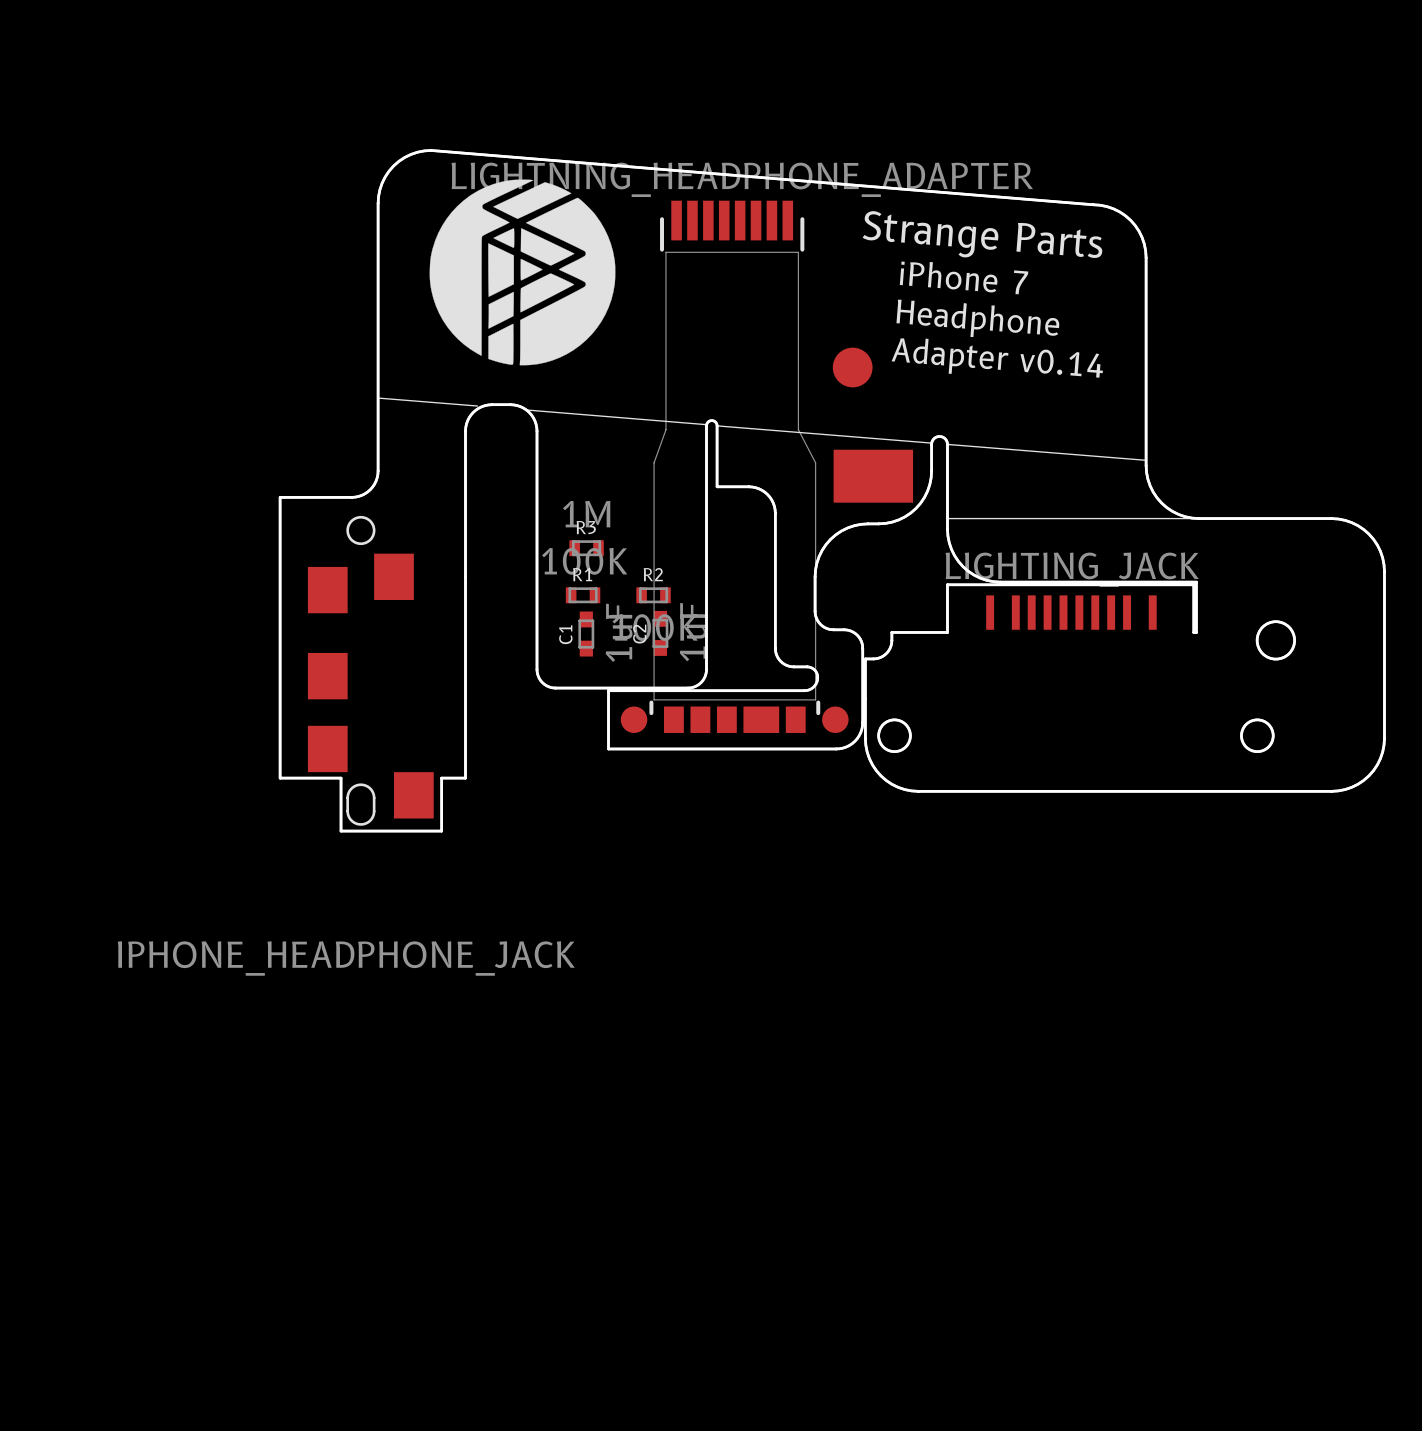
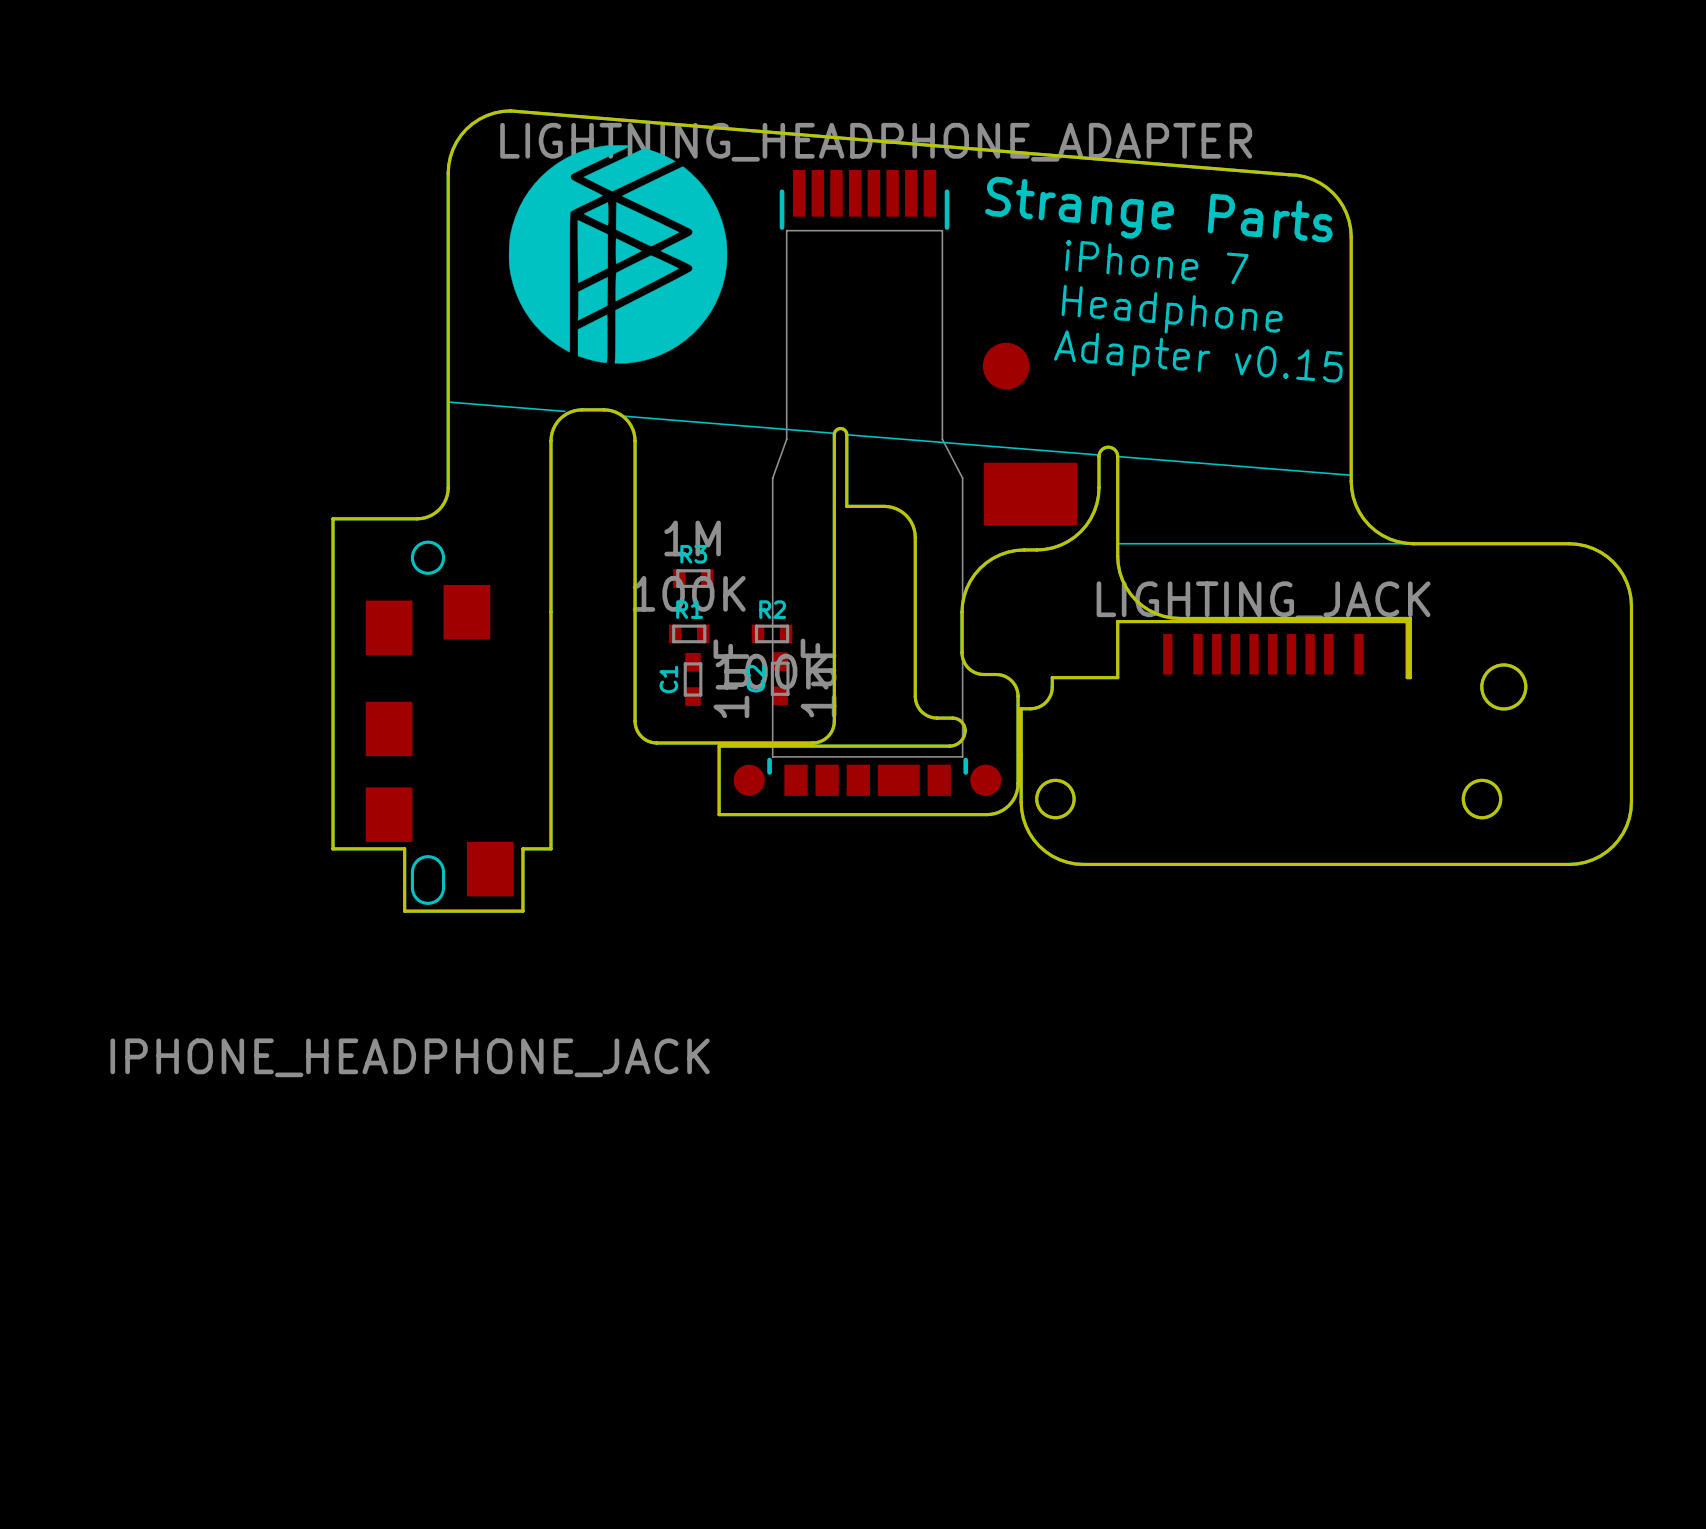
text: Adapter v0.14 (997, 358) -> Adapter v0.15 (1198, 356)

